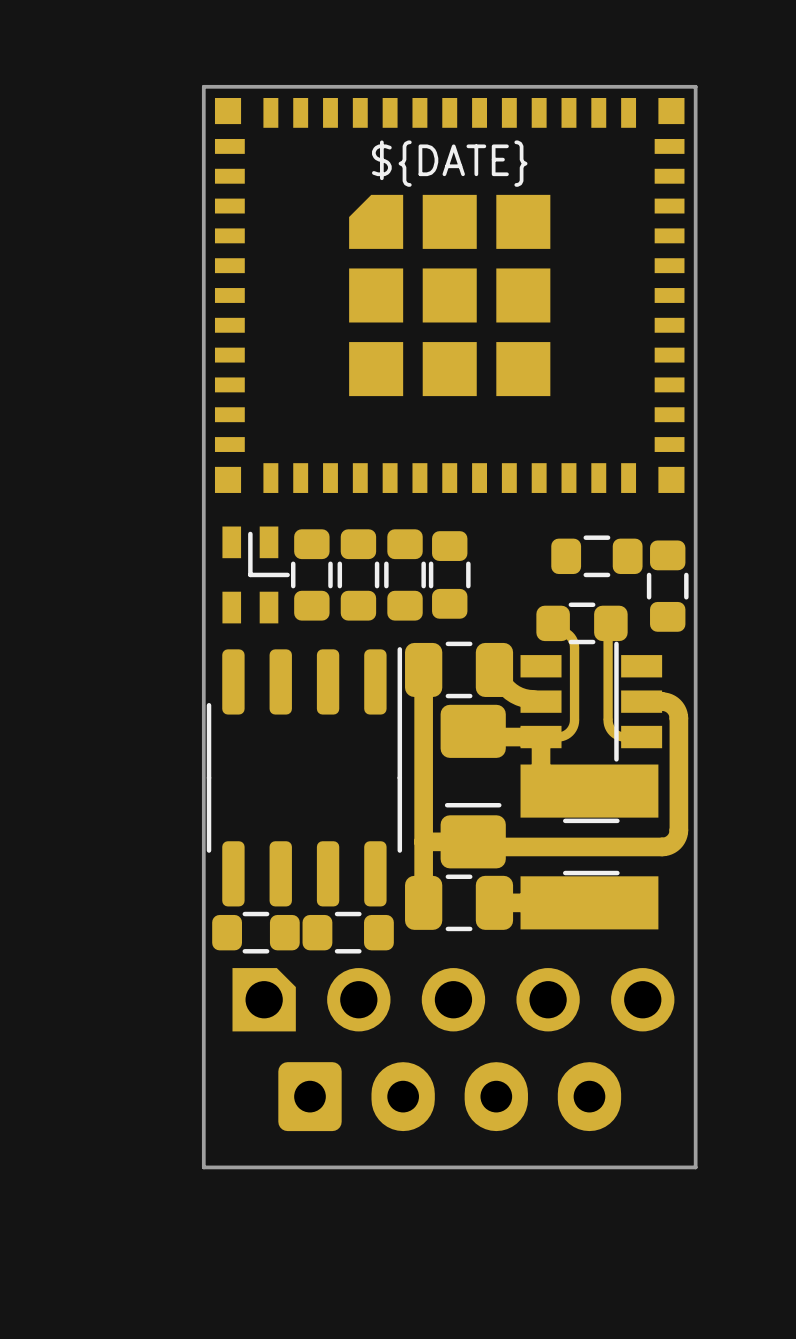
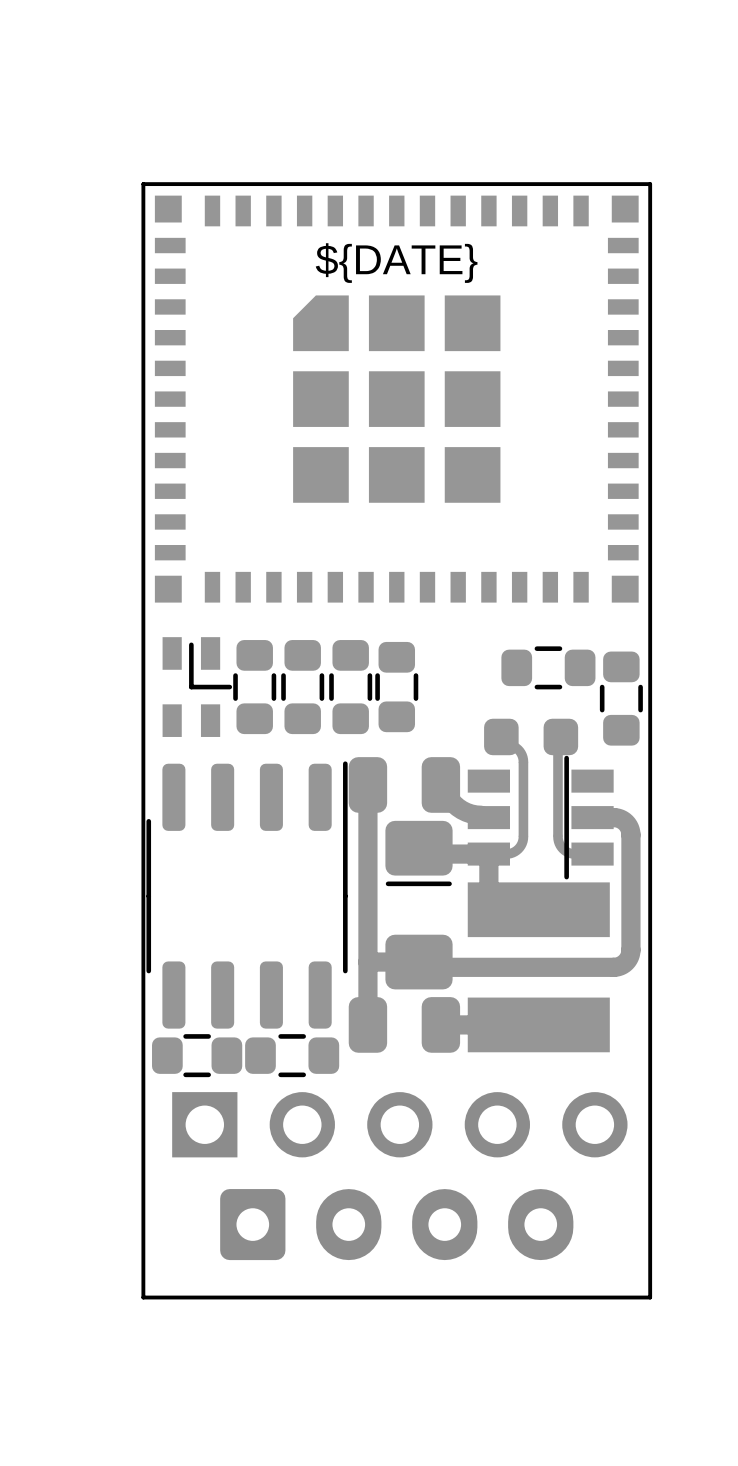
drawing: [568, 602, 596, 645] -> none
part footprint: [405, 605, 689, 930] -> [348, 718, 641, 1053]
drawing: [445, 641, 473, 699] -> none
drawing: [444, 802, 502, 808] -> none
drawing: [563, 818, 620, 876] -> none
drawing: [445, 874, 473, 932] -> none
part footprint: [232, 968, 675, 1032] -> [172, 1092, 628, 1158]

